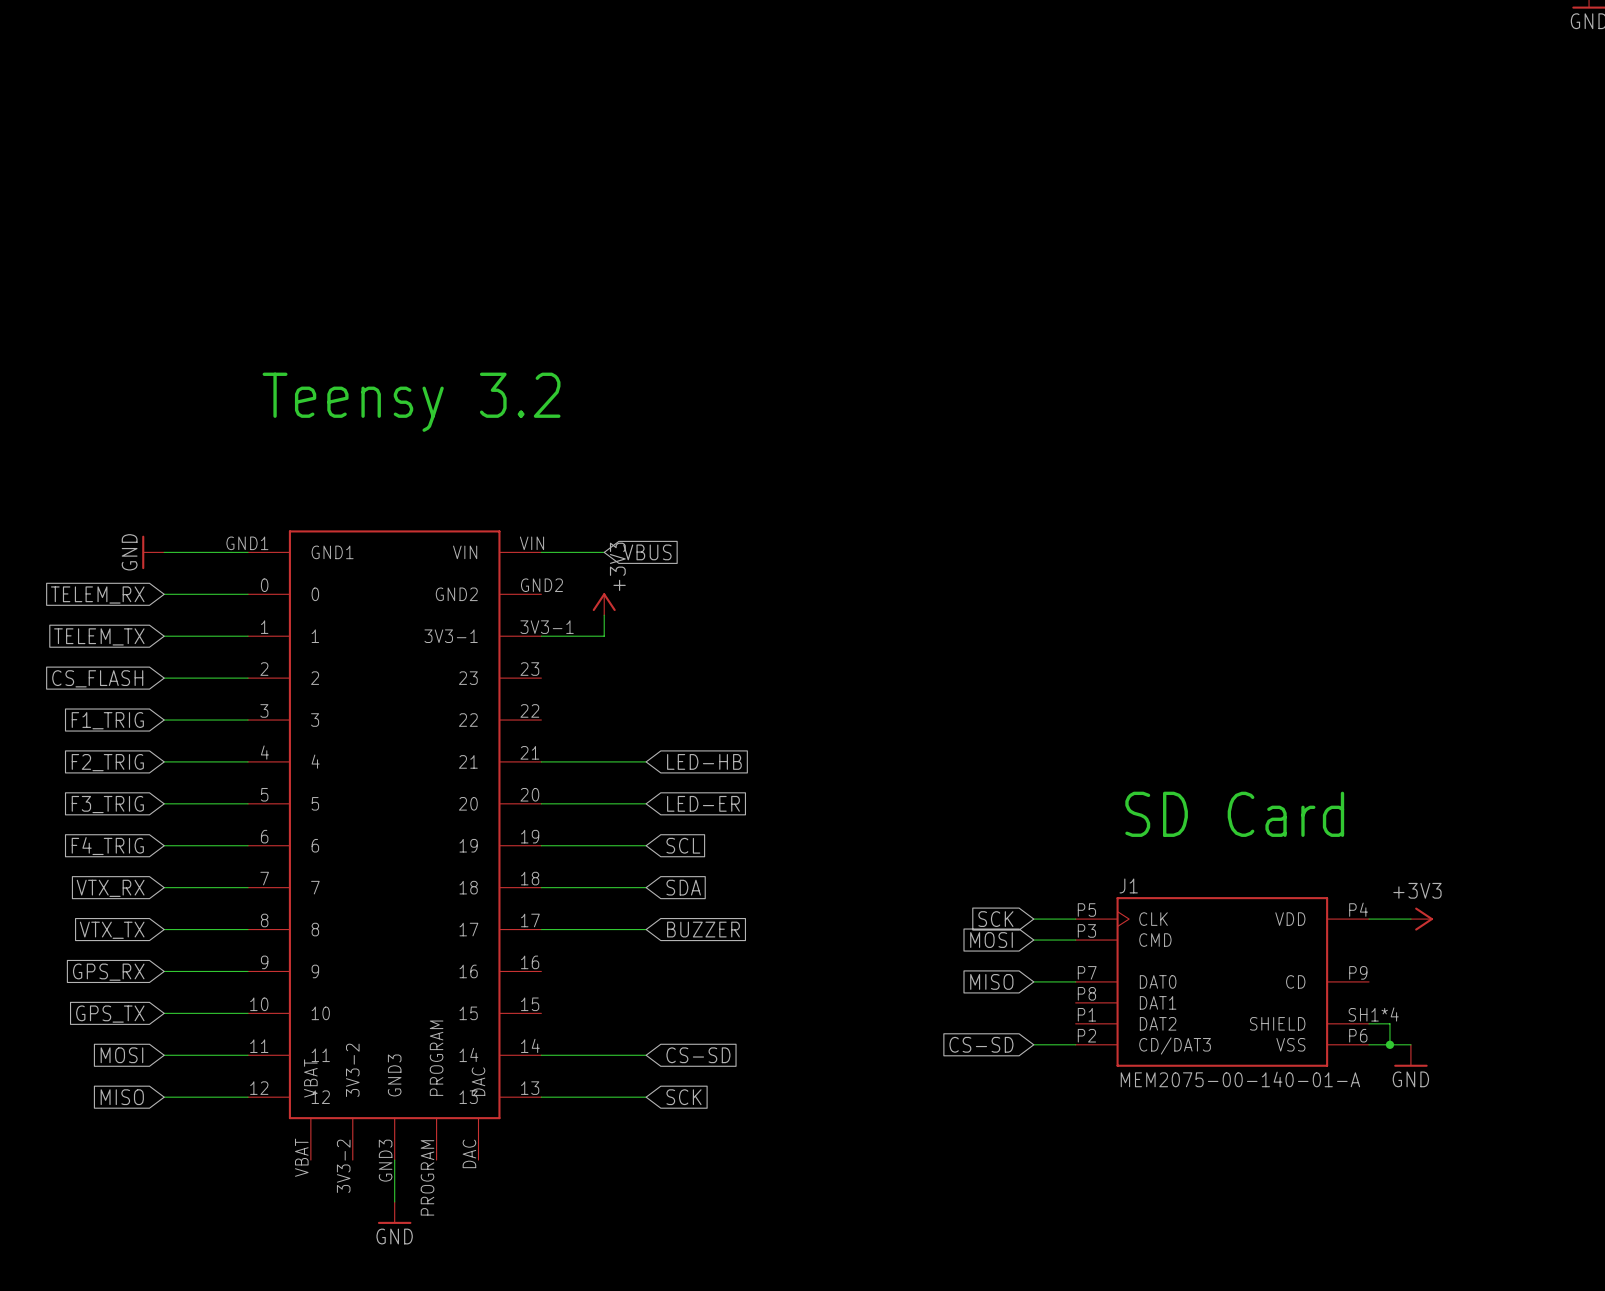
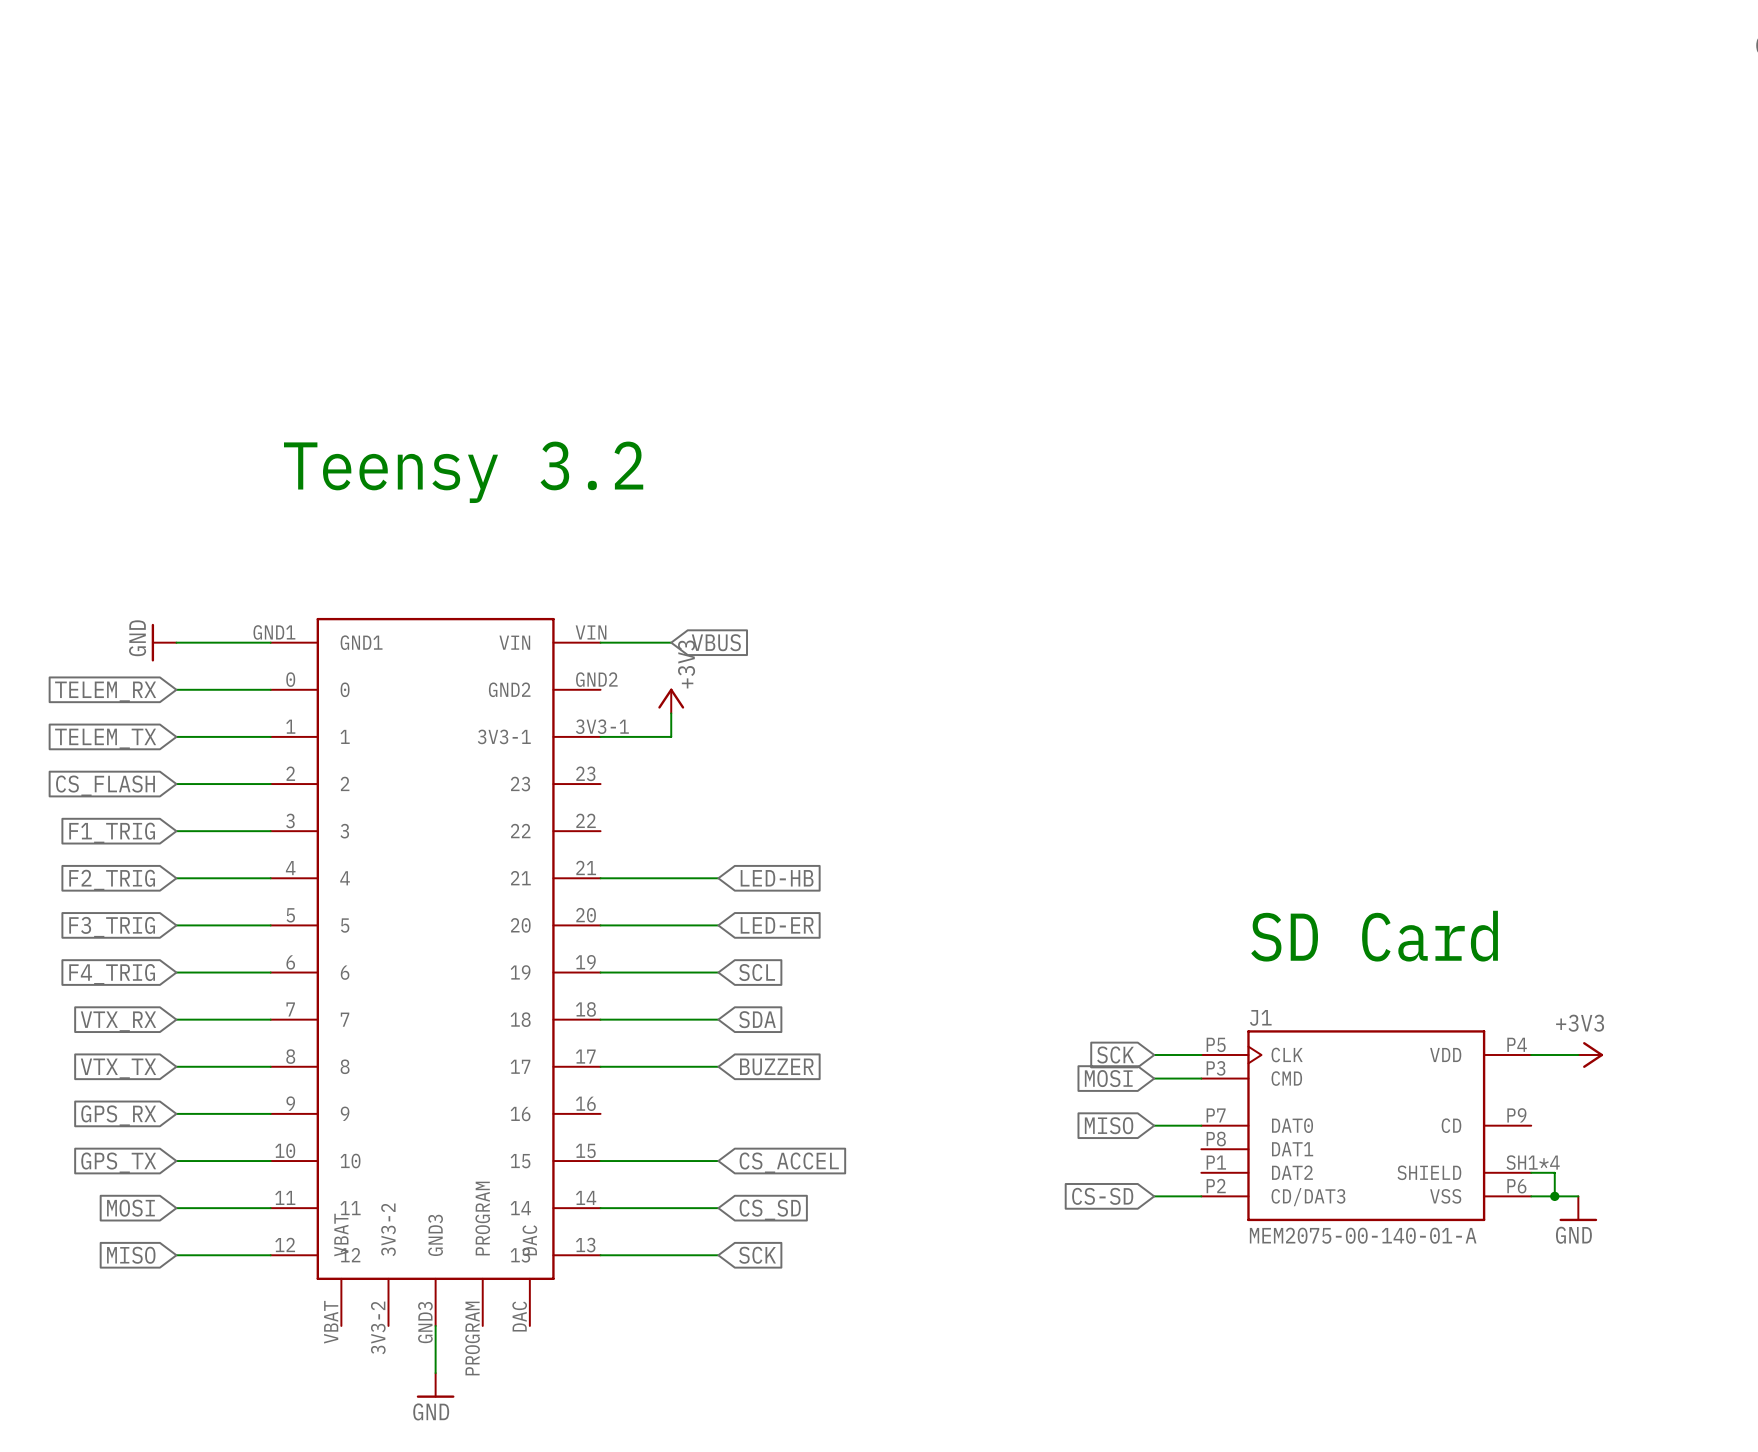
wire: none -> (600, 1161) (718, 1161)
global label: none -> CS_ACCEL (789, 1162)
global label: CS-SD (698, 1055) -> CS_SD (770, 1210)

